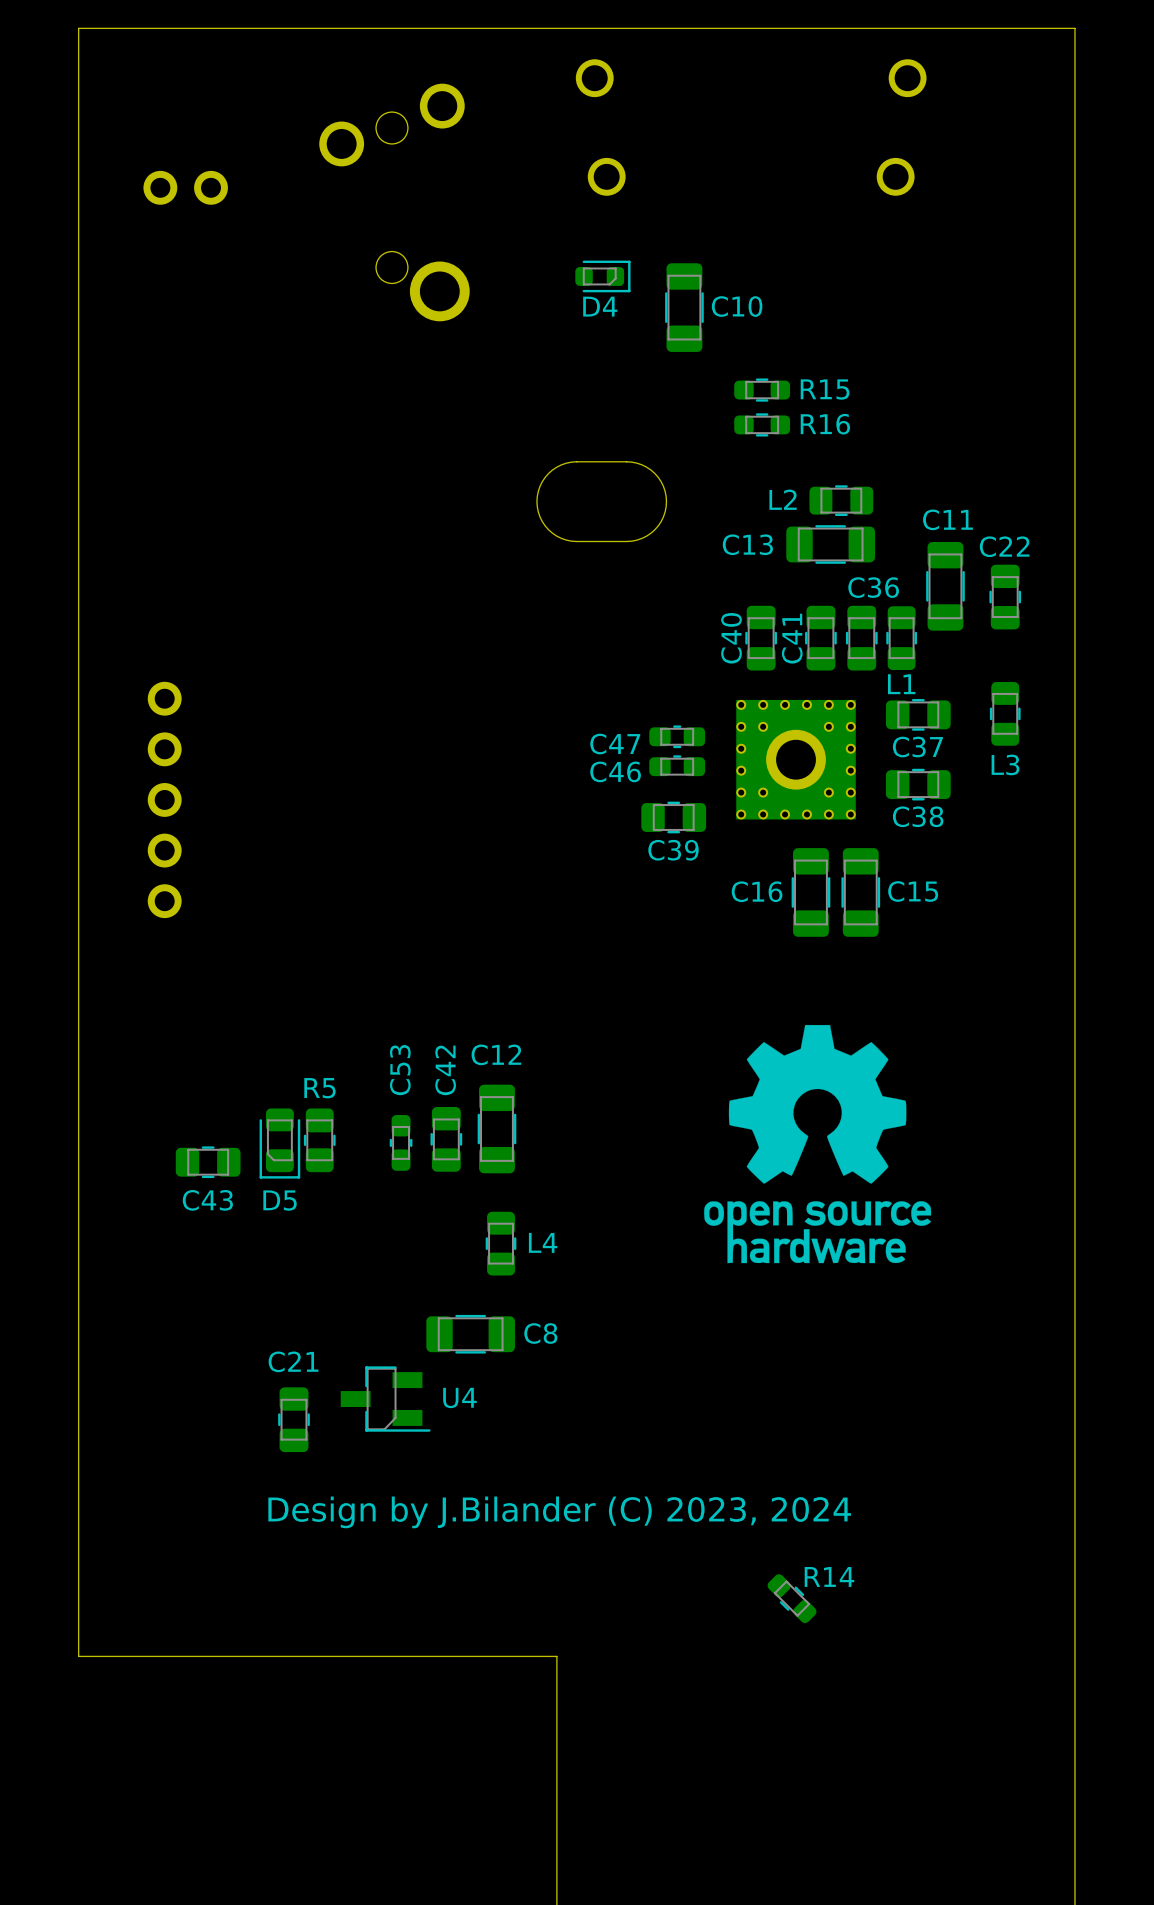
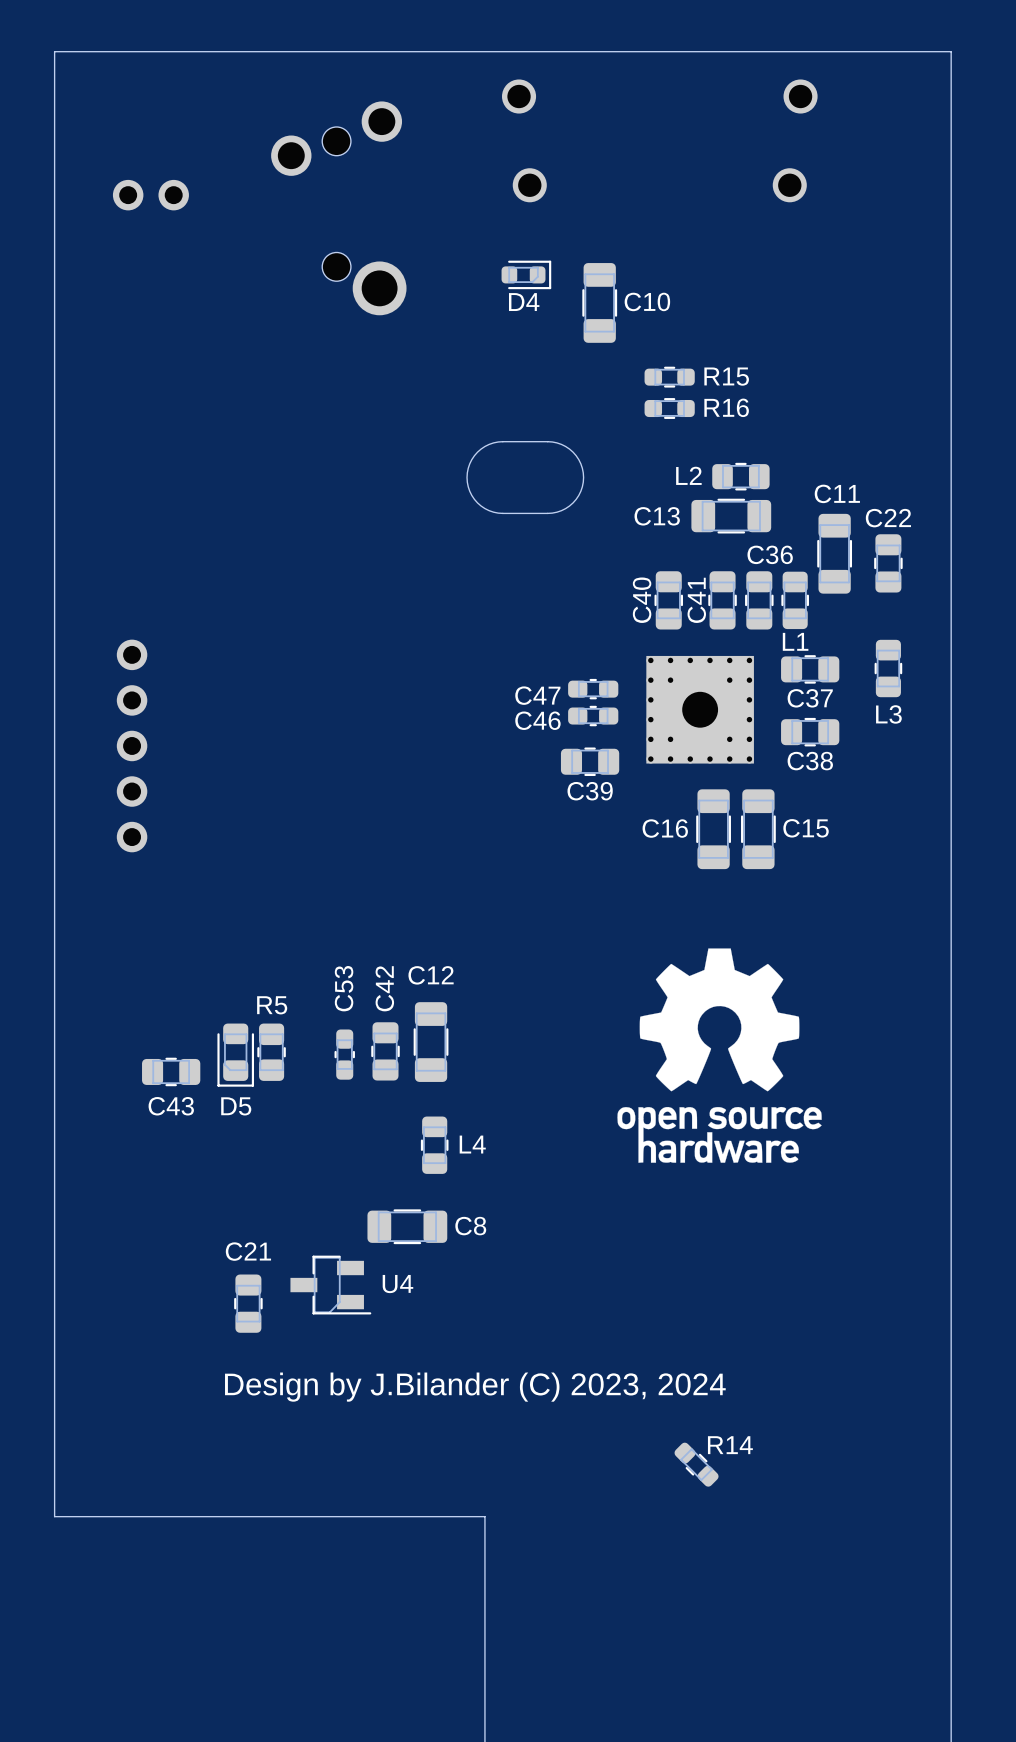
C46 footprint: [649, 755, 706, 777] -> [568, 705, 619, 727]

